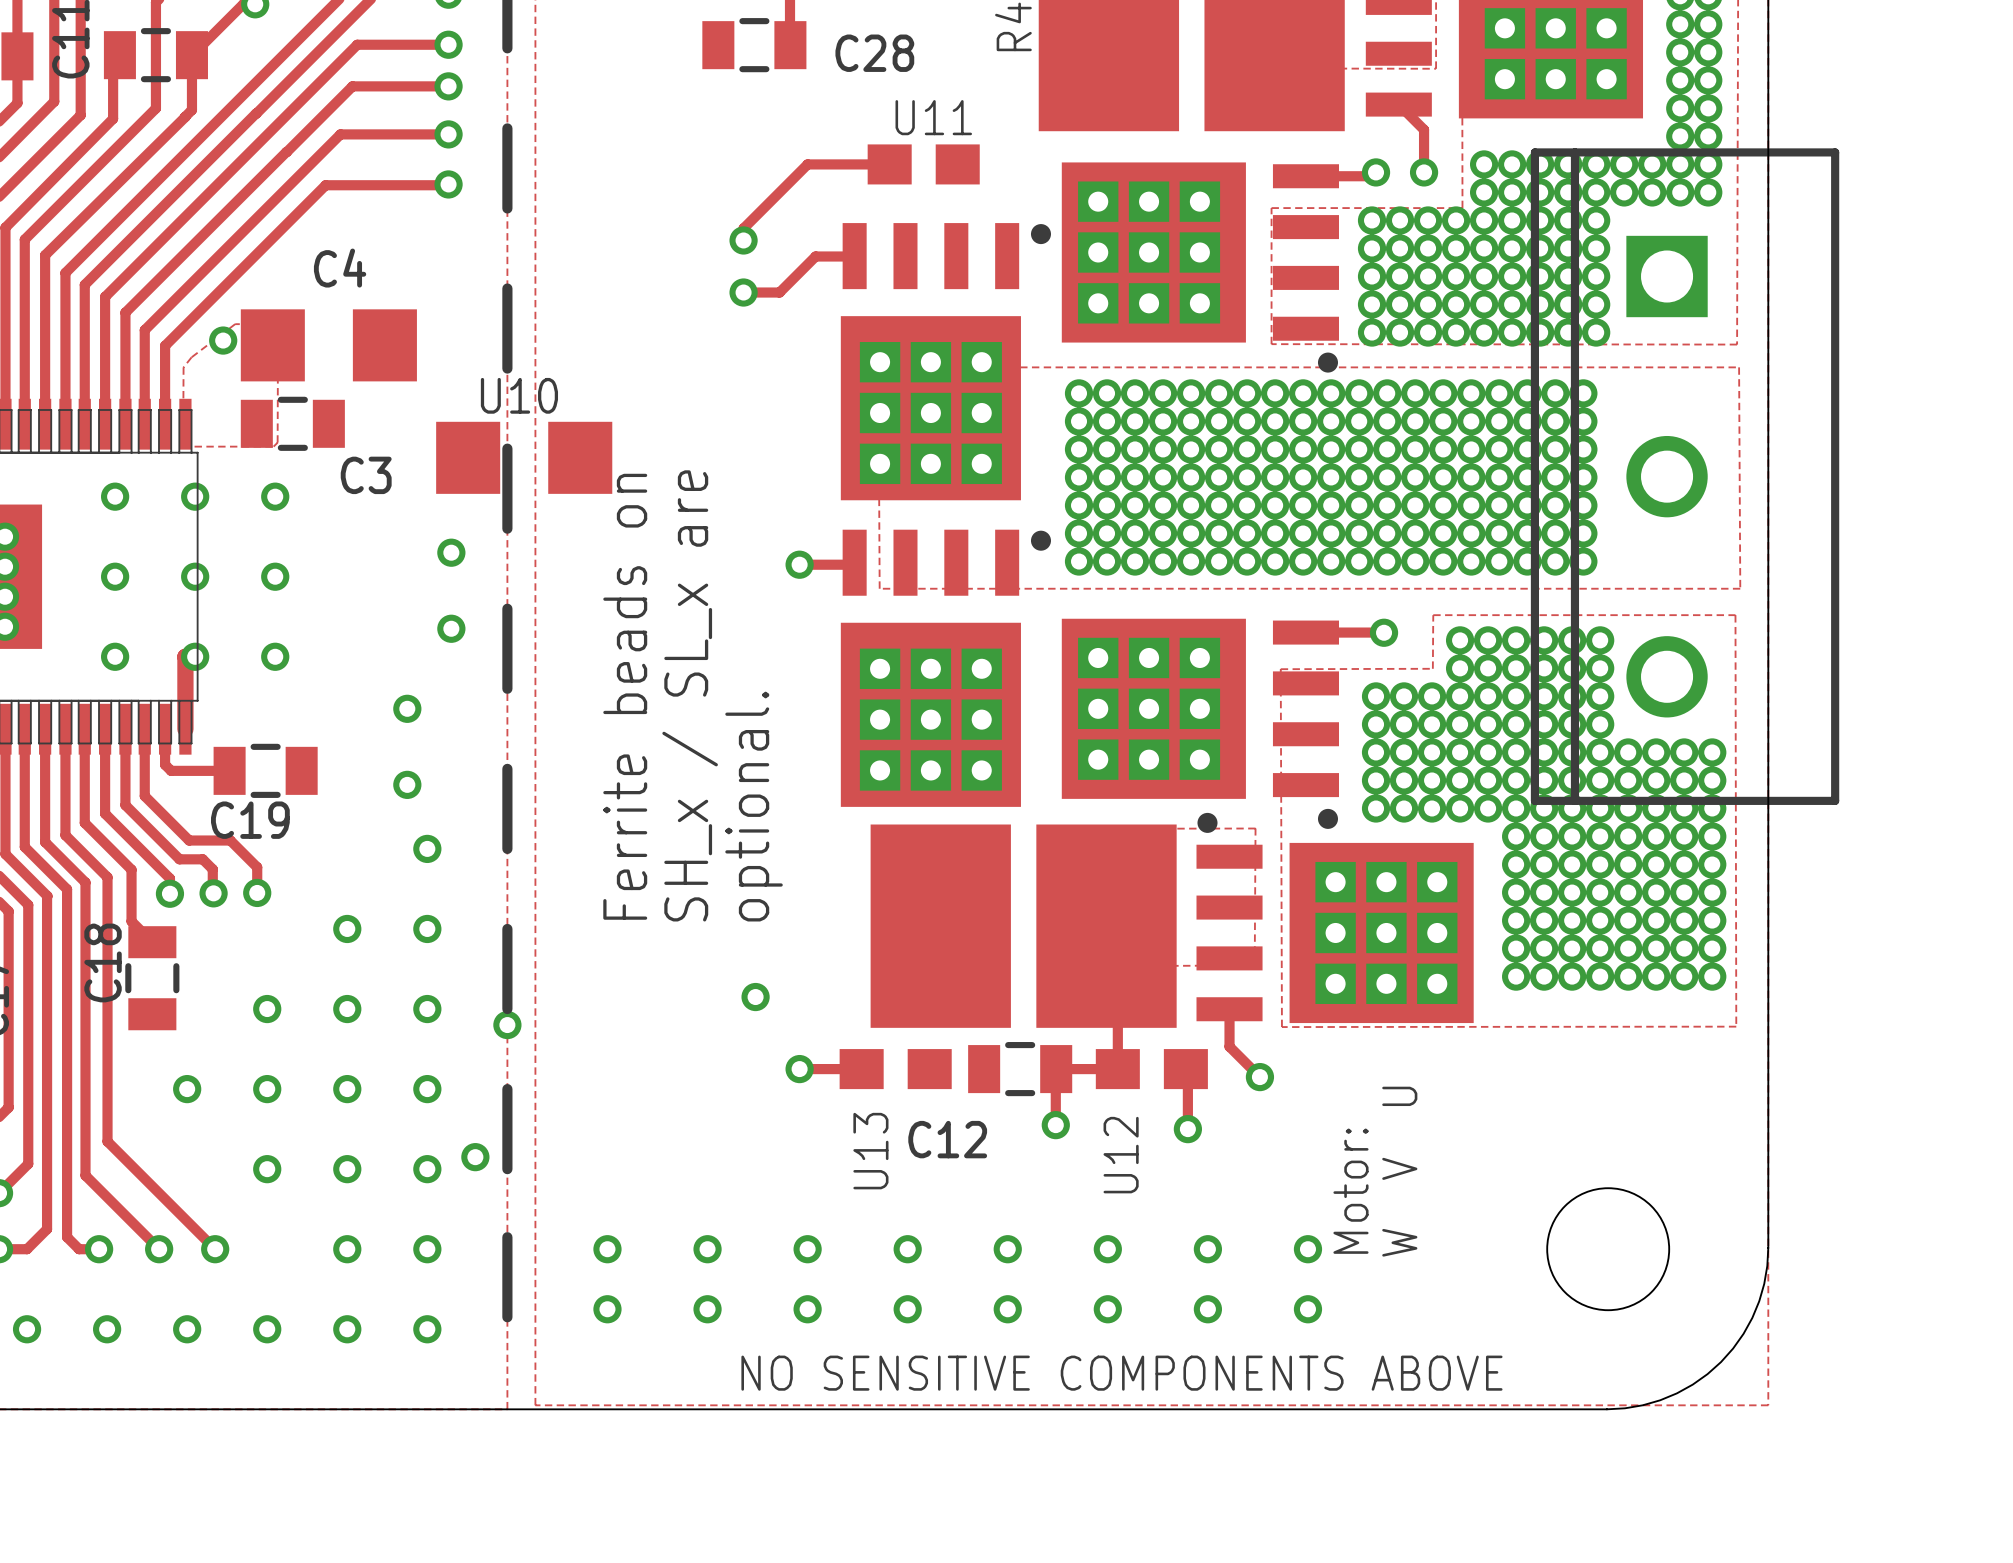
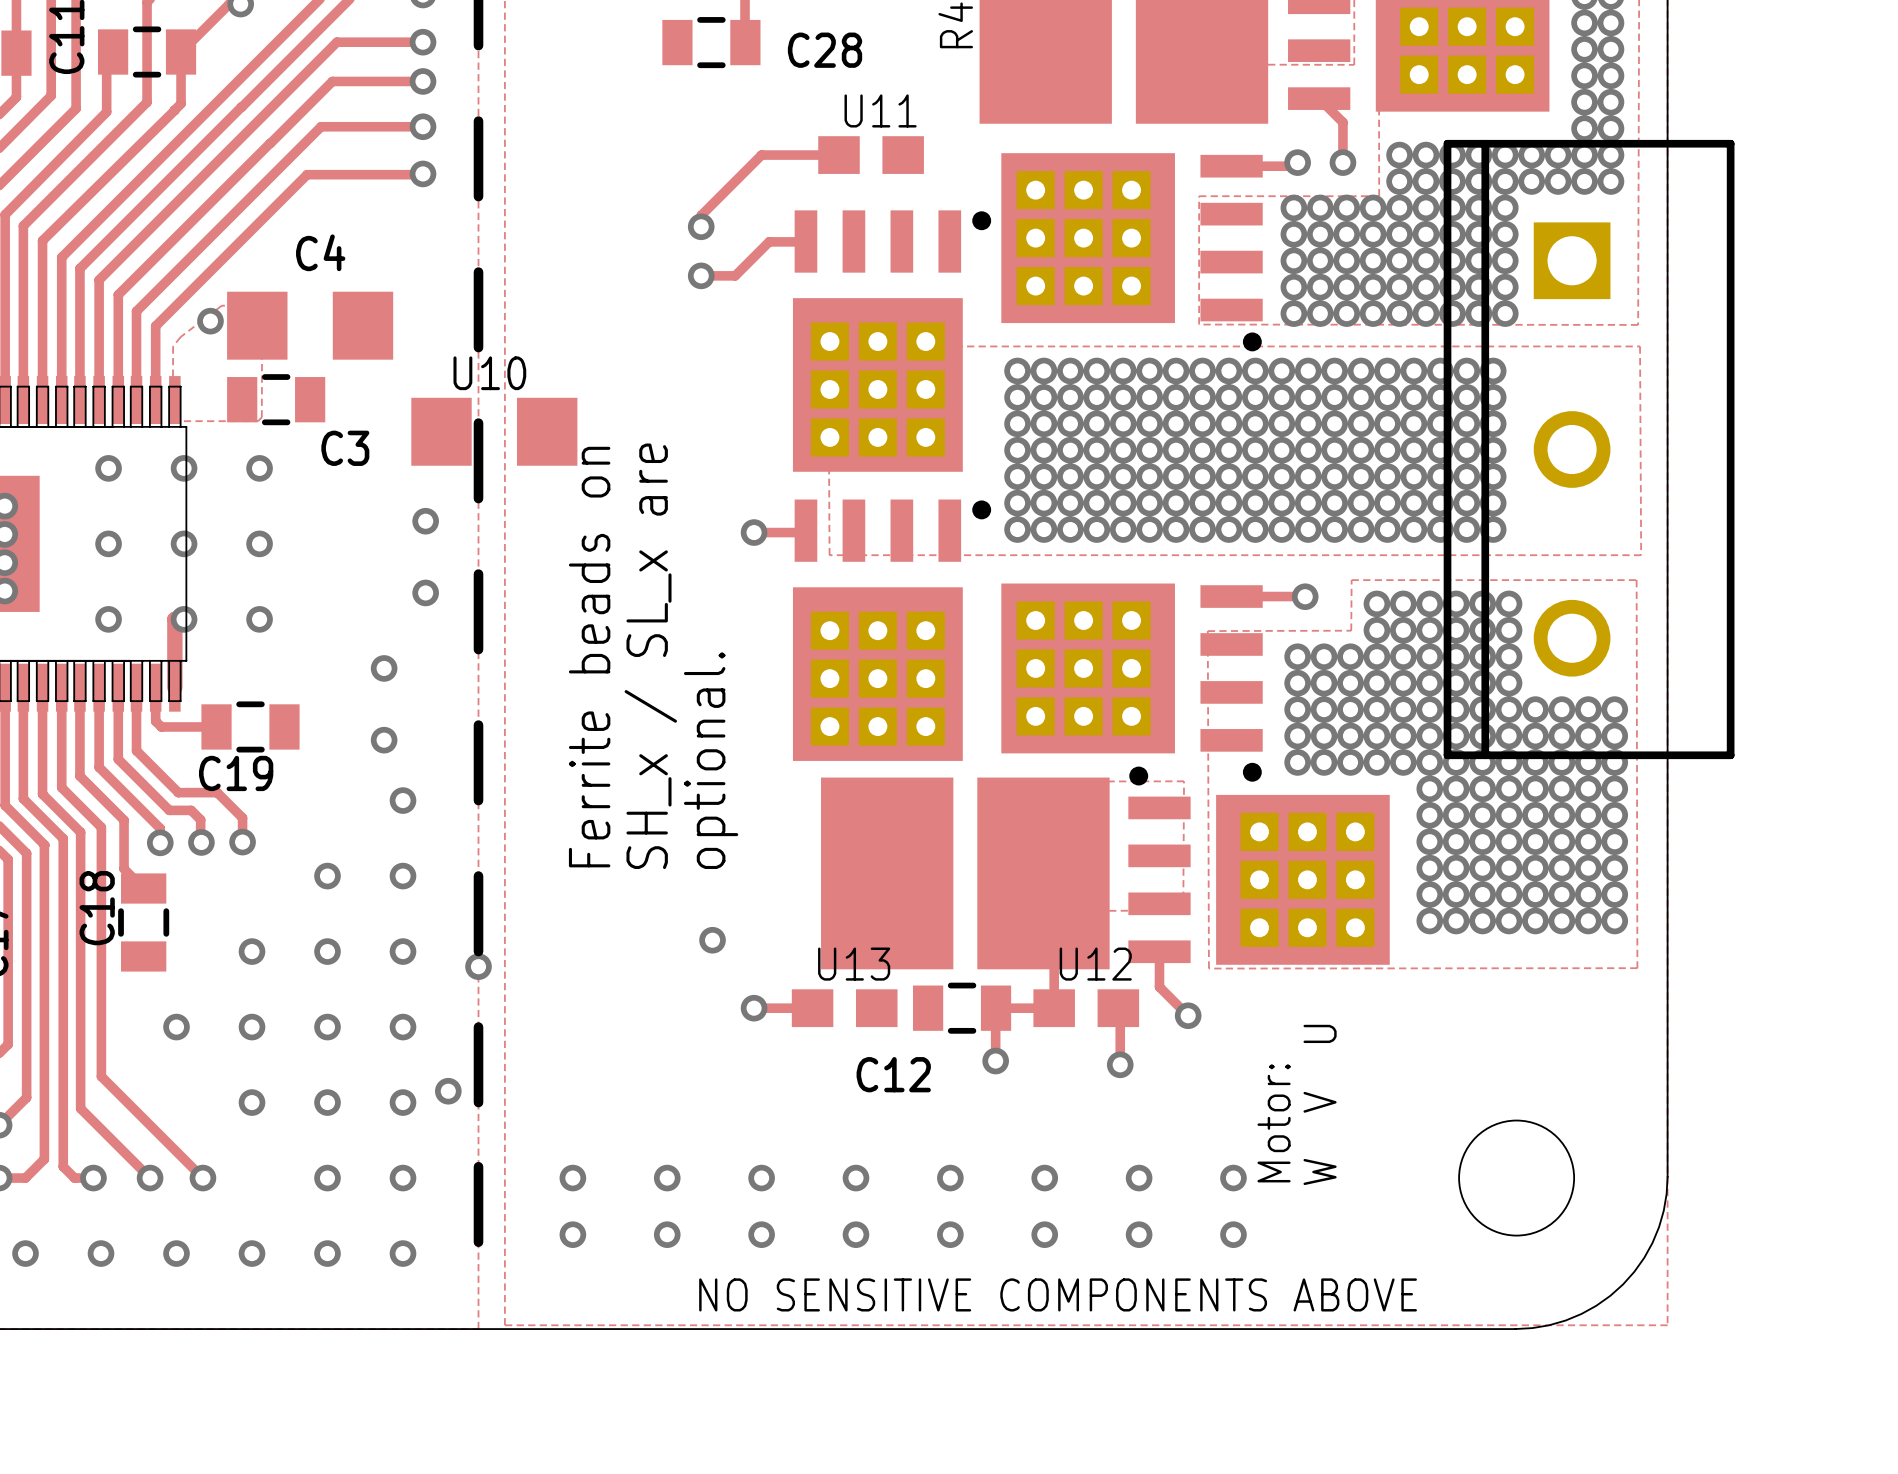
U13 name rotation: 0° (870, 1151) -> 90° clockwise (854, 964)
U13 name position: U13 (870, 1151) -> U13 (854, 964)
U12 name rotation: 0° (1121, 1155) -> 90° clockwise (1095, 964)
U12 name position: U12 (1121, 1155) -> U12 (1095, 964)

